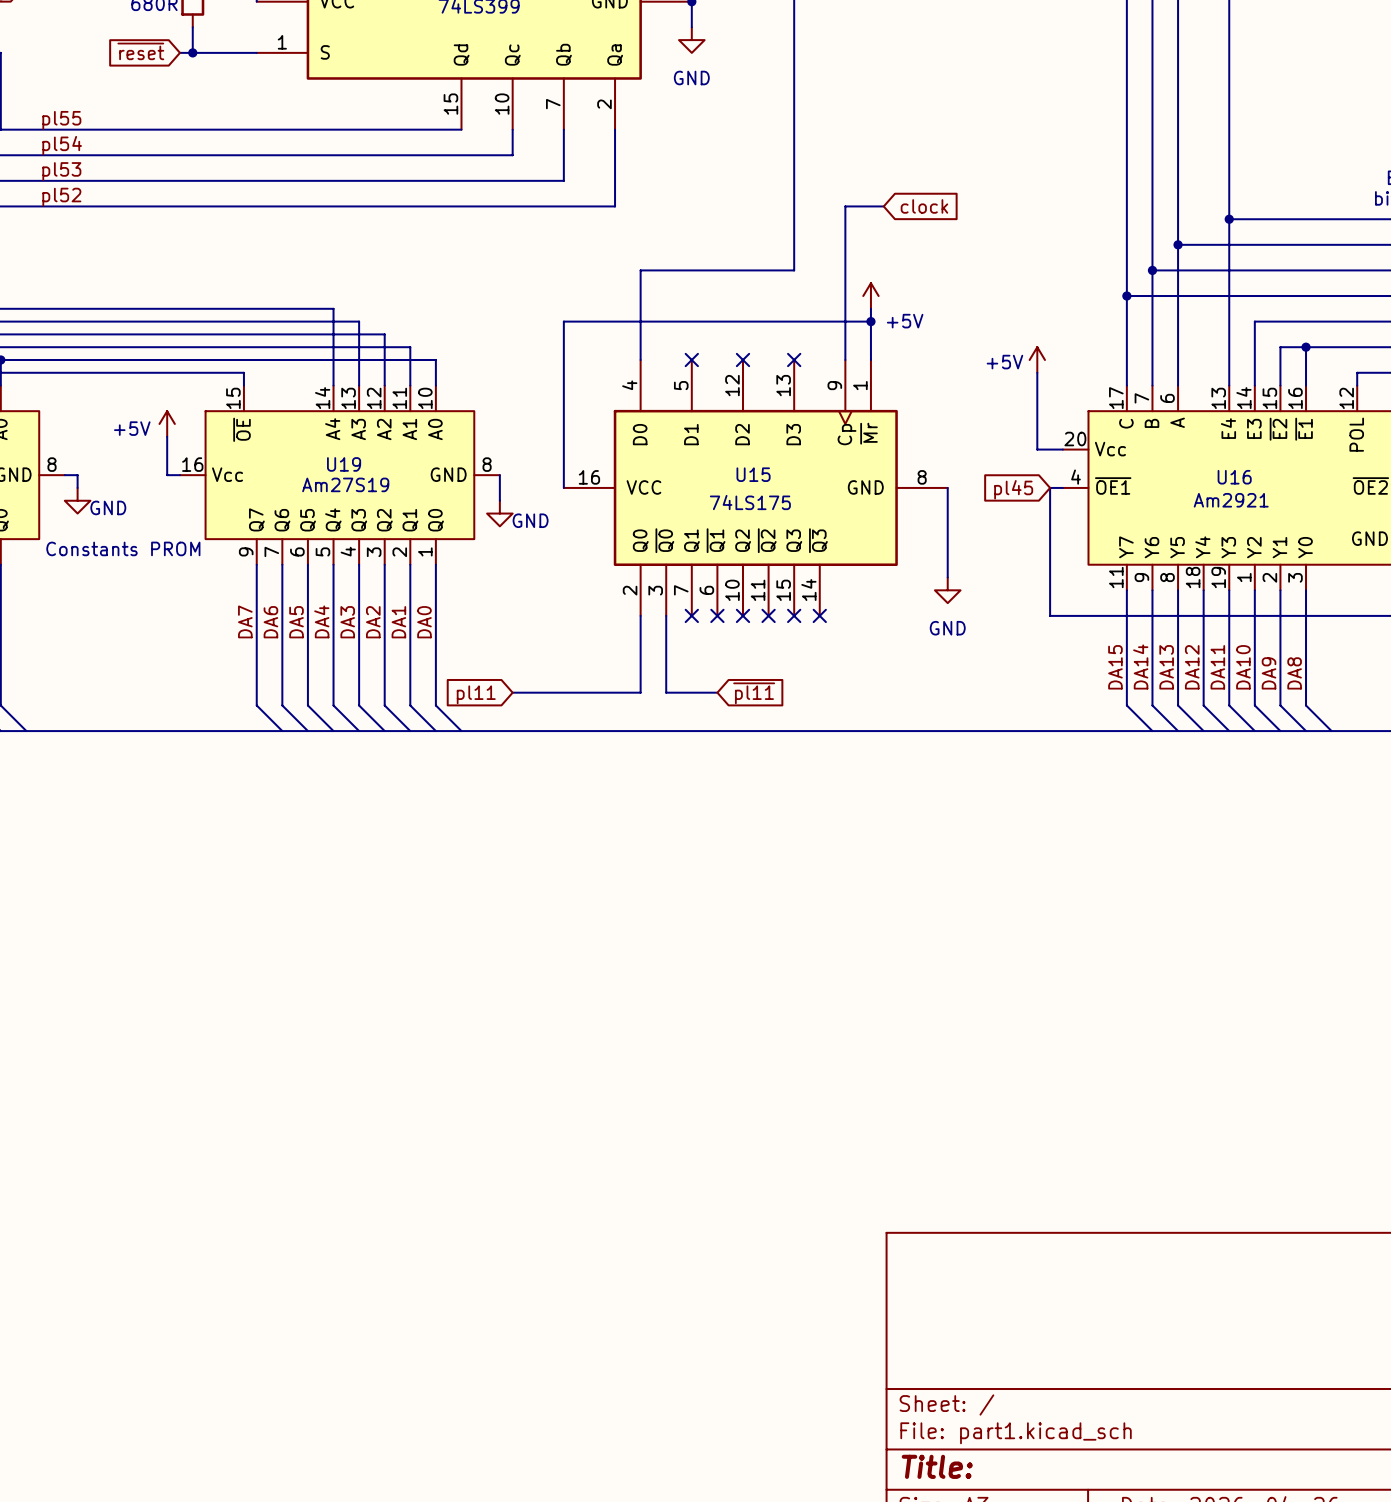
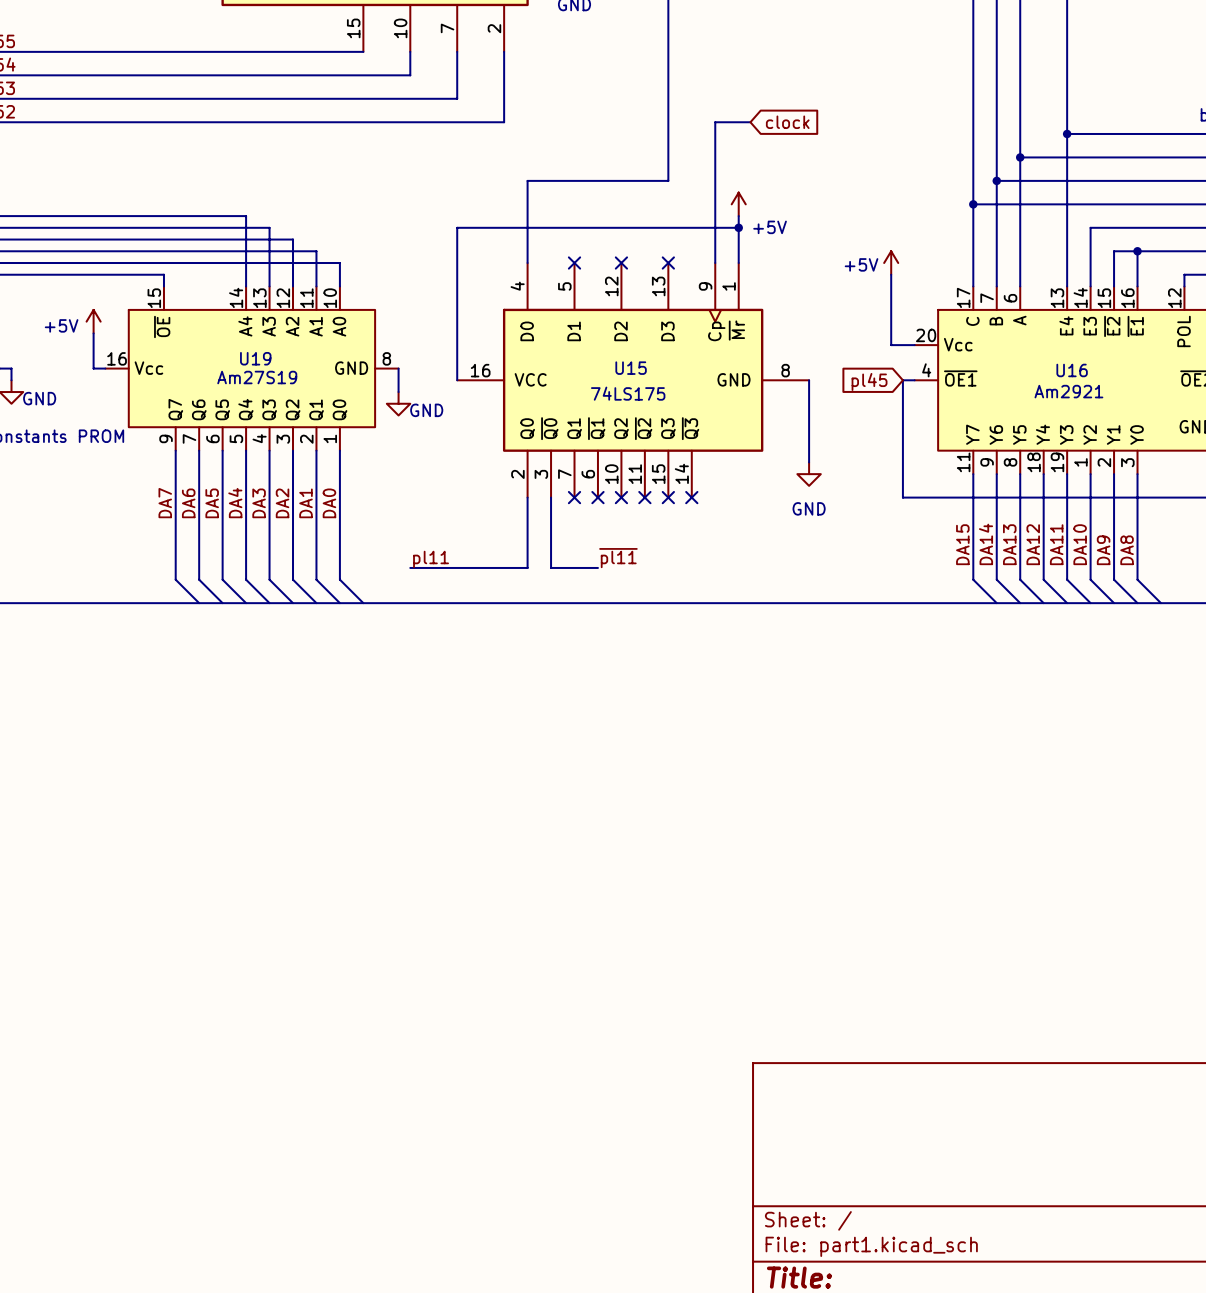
label: none -> ~{pl11} (618, 558)
label: none -> pl11 (431, 559)
global label: ~{pl11} (754, 693) -> none
global label: pl11 (476, 694) -> none

